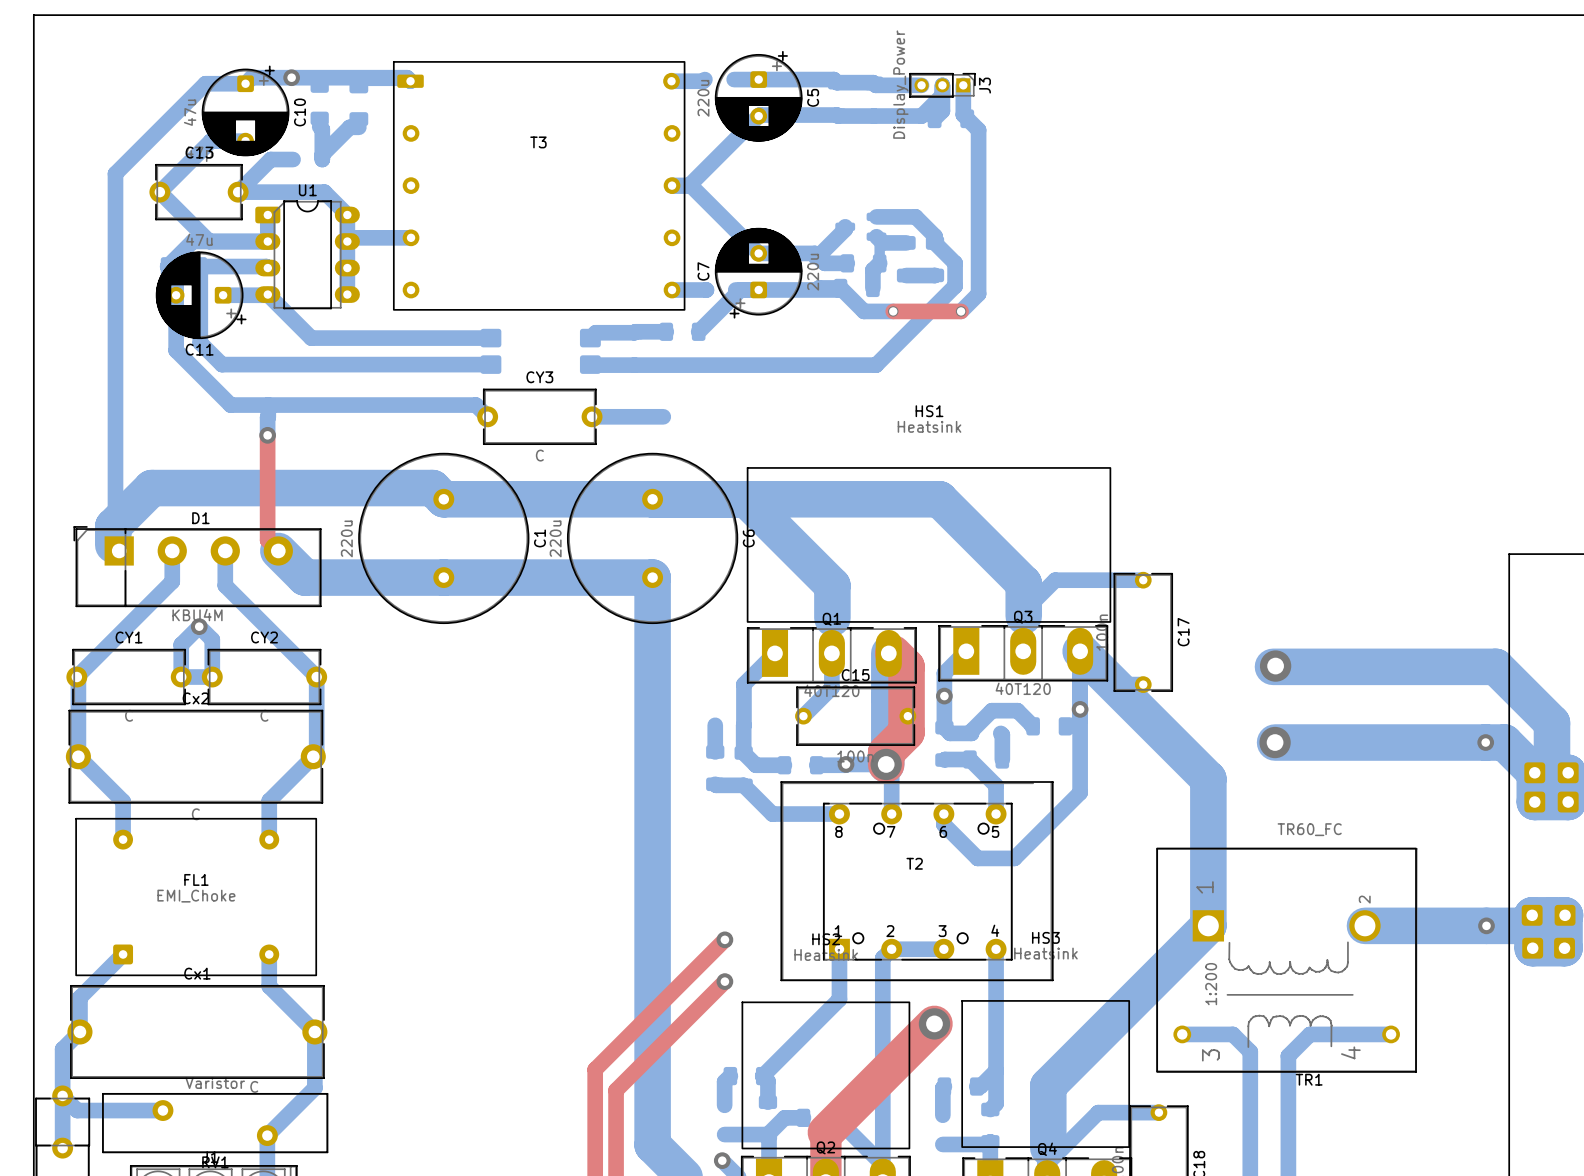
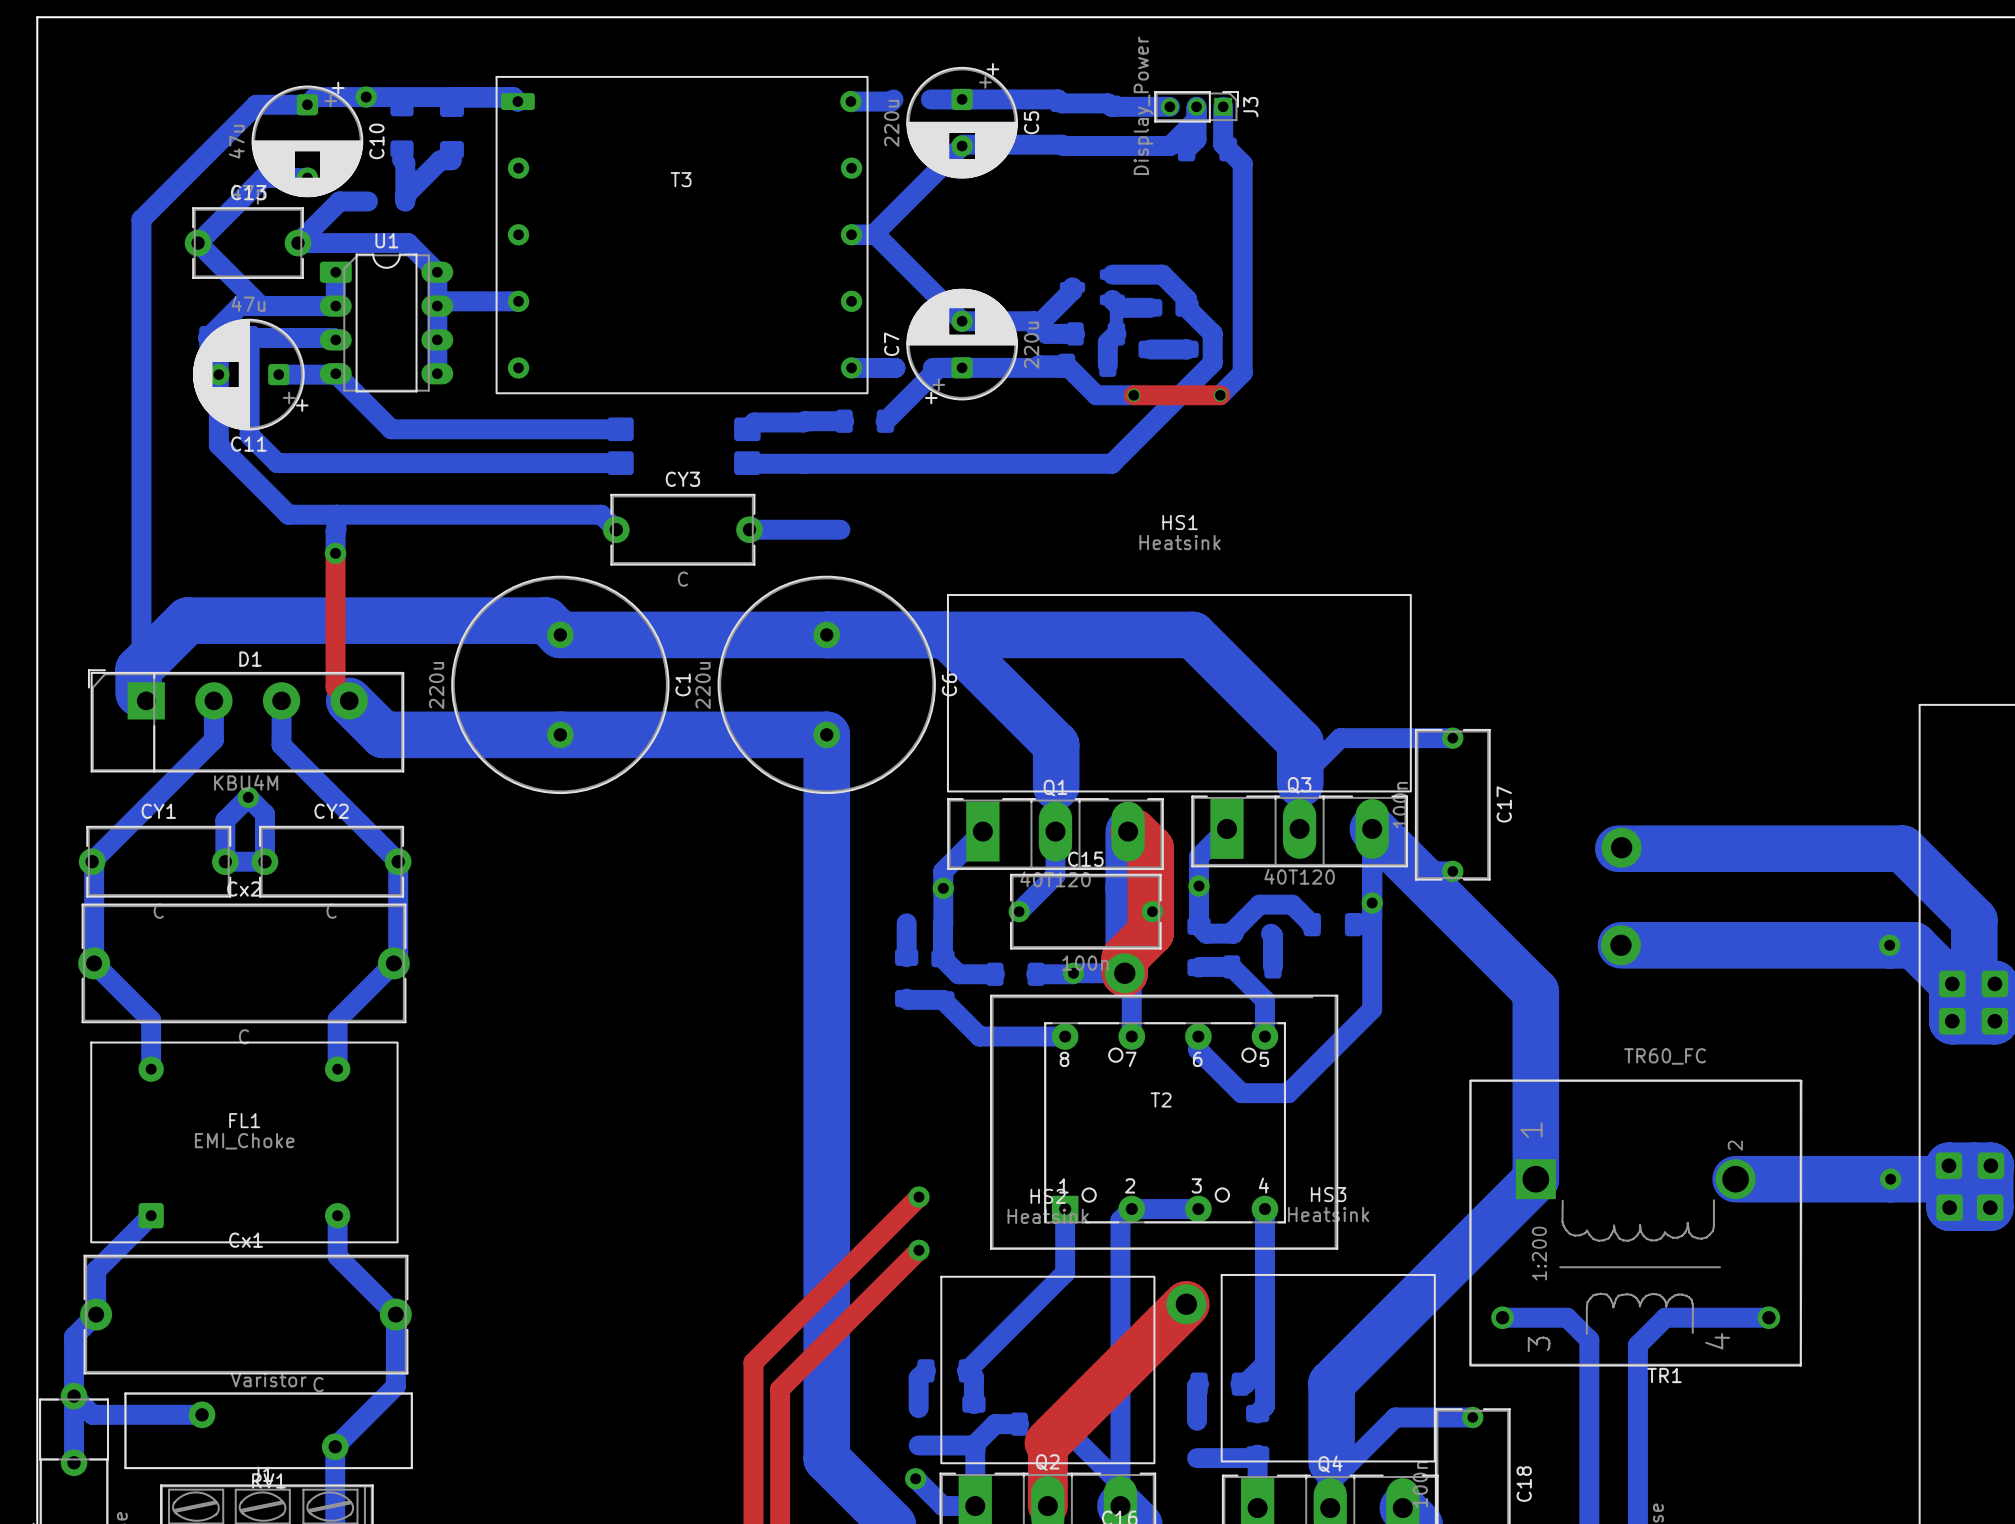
via: none -> (943, 888)

